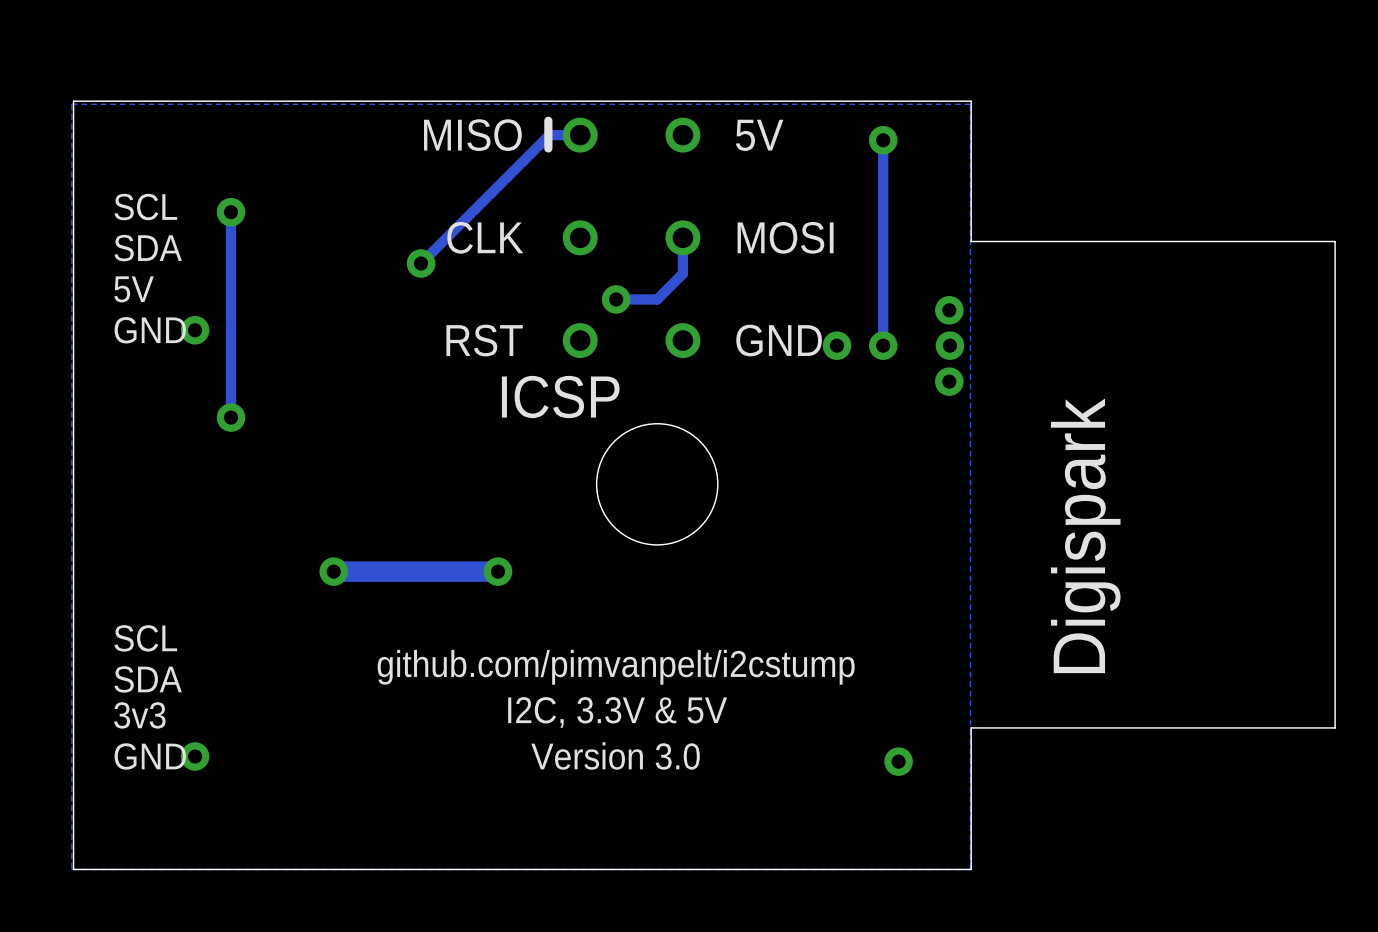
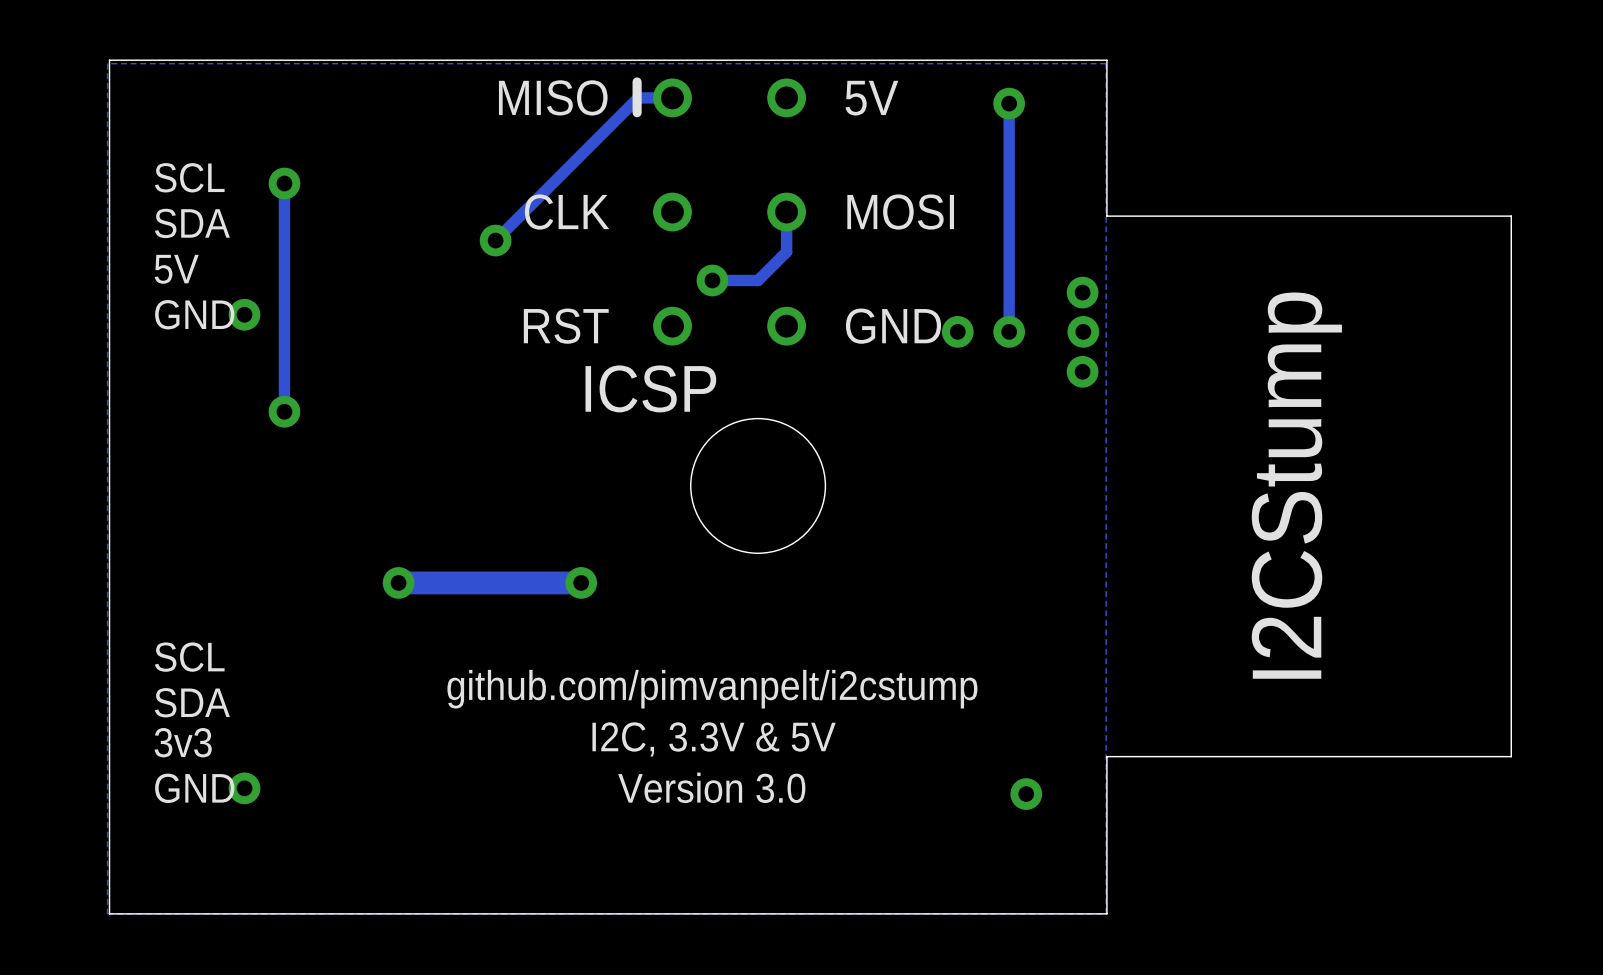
text: none -> I2CStump (1296, 485)
text: Digispark (1085, 535) -> none

